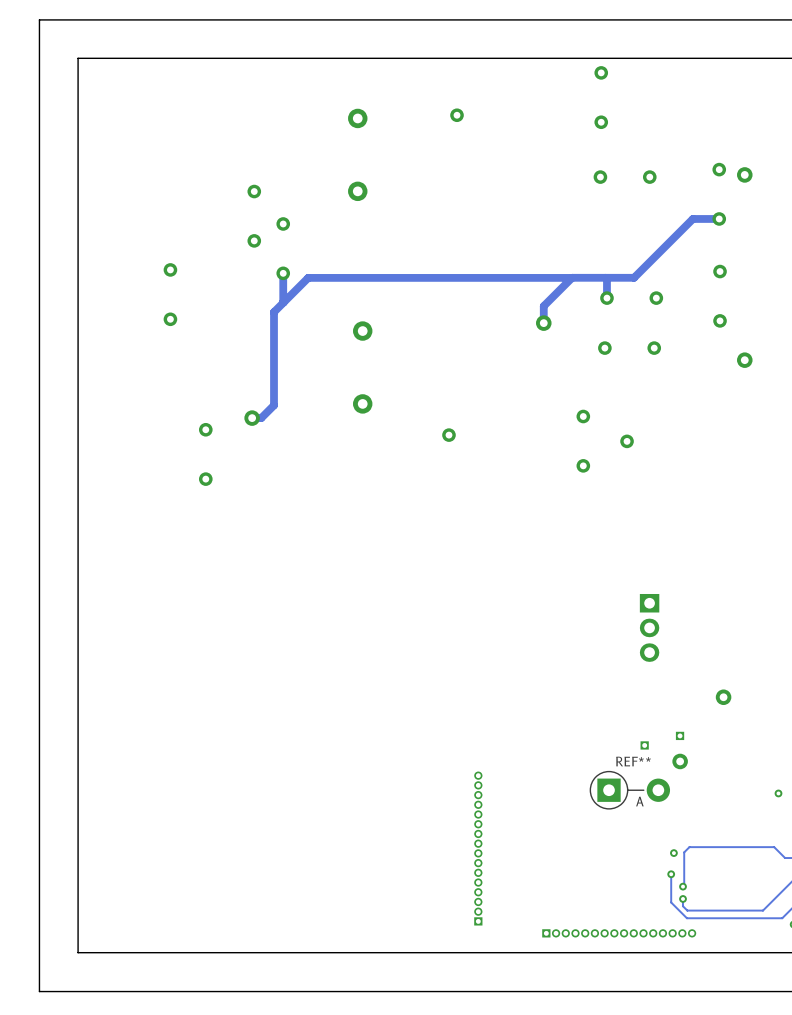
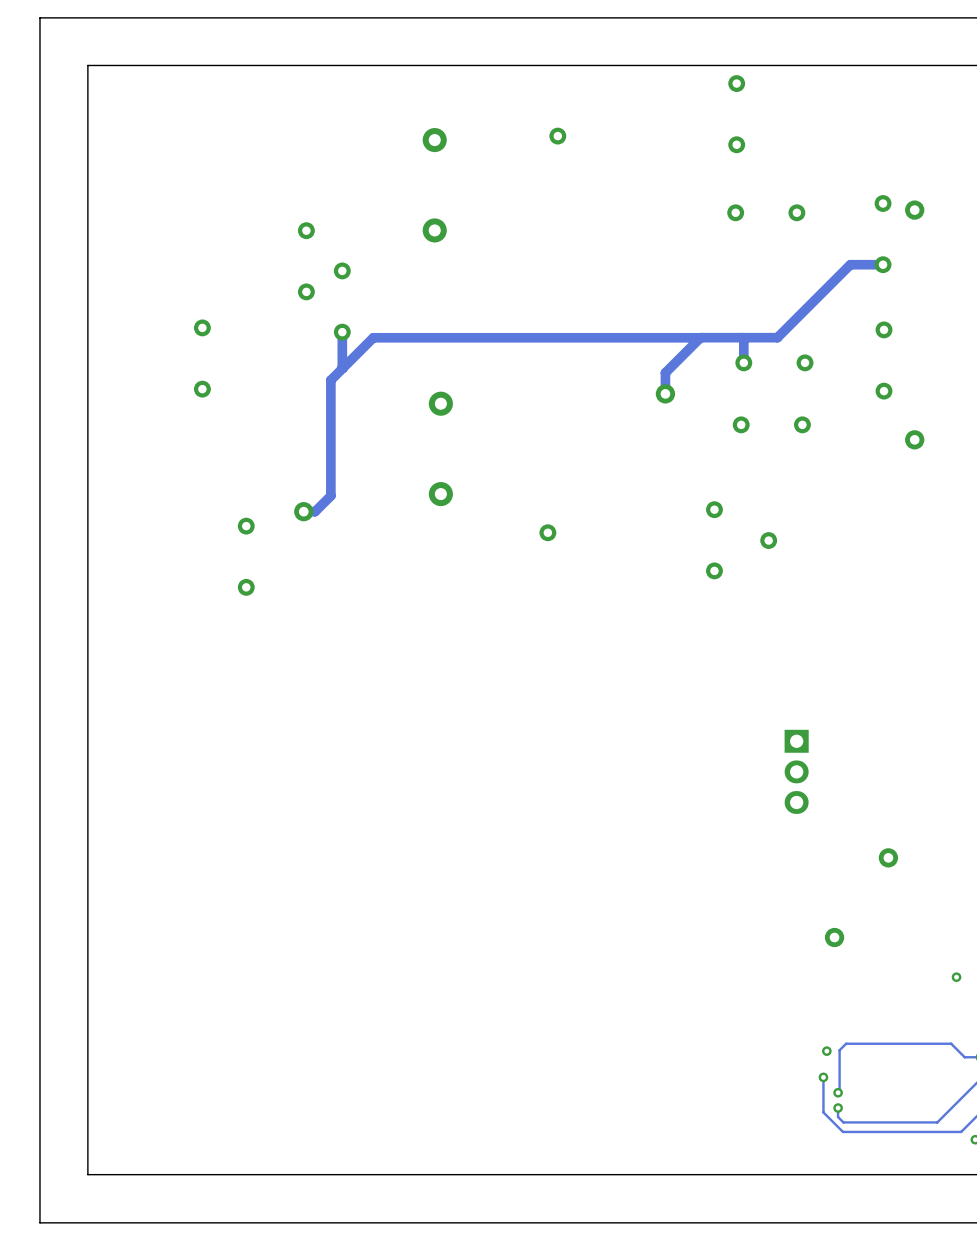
part: (680, 735) -> none
part: (644, 745) -> none
REF**: (629, 790) -> none
part: (478, 848) -> none
part: (619, 933) -> none

